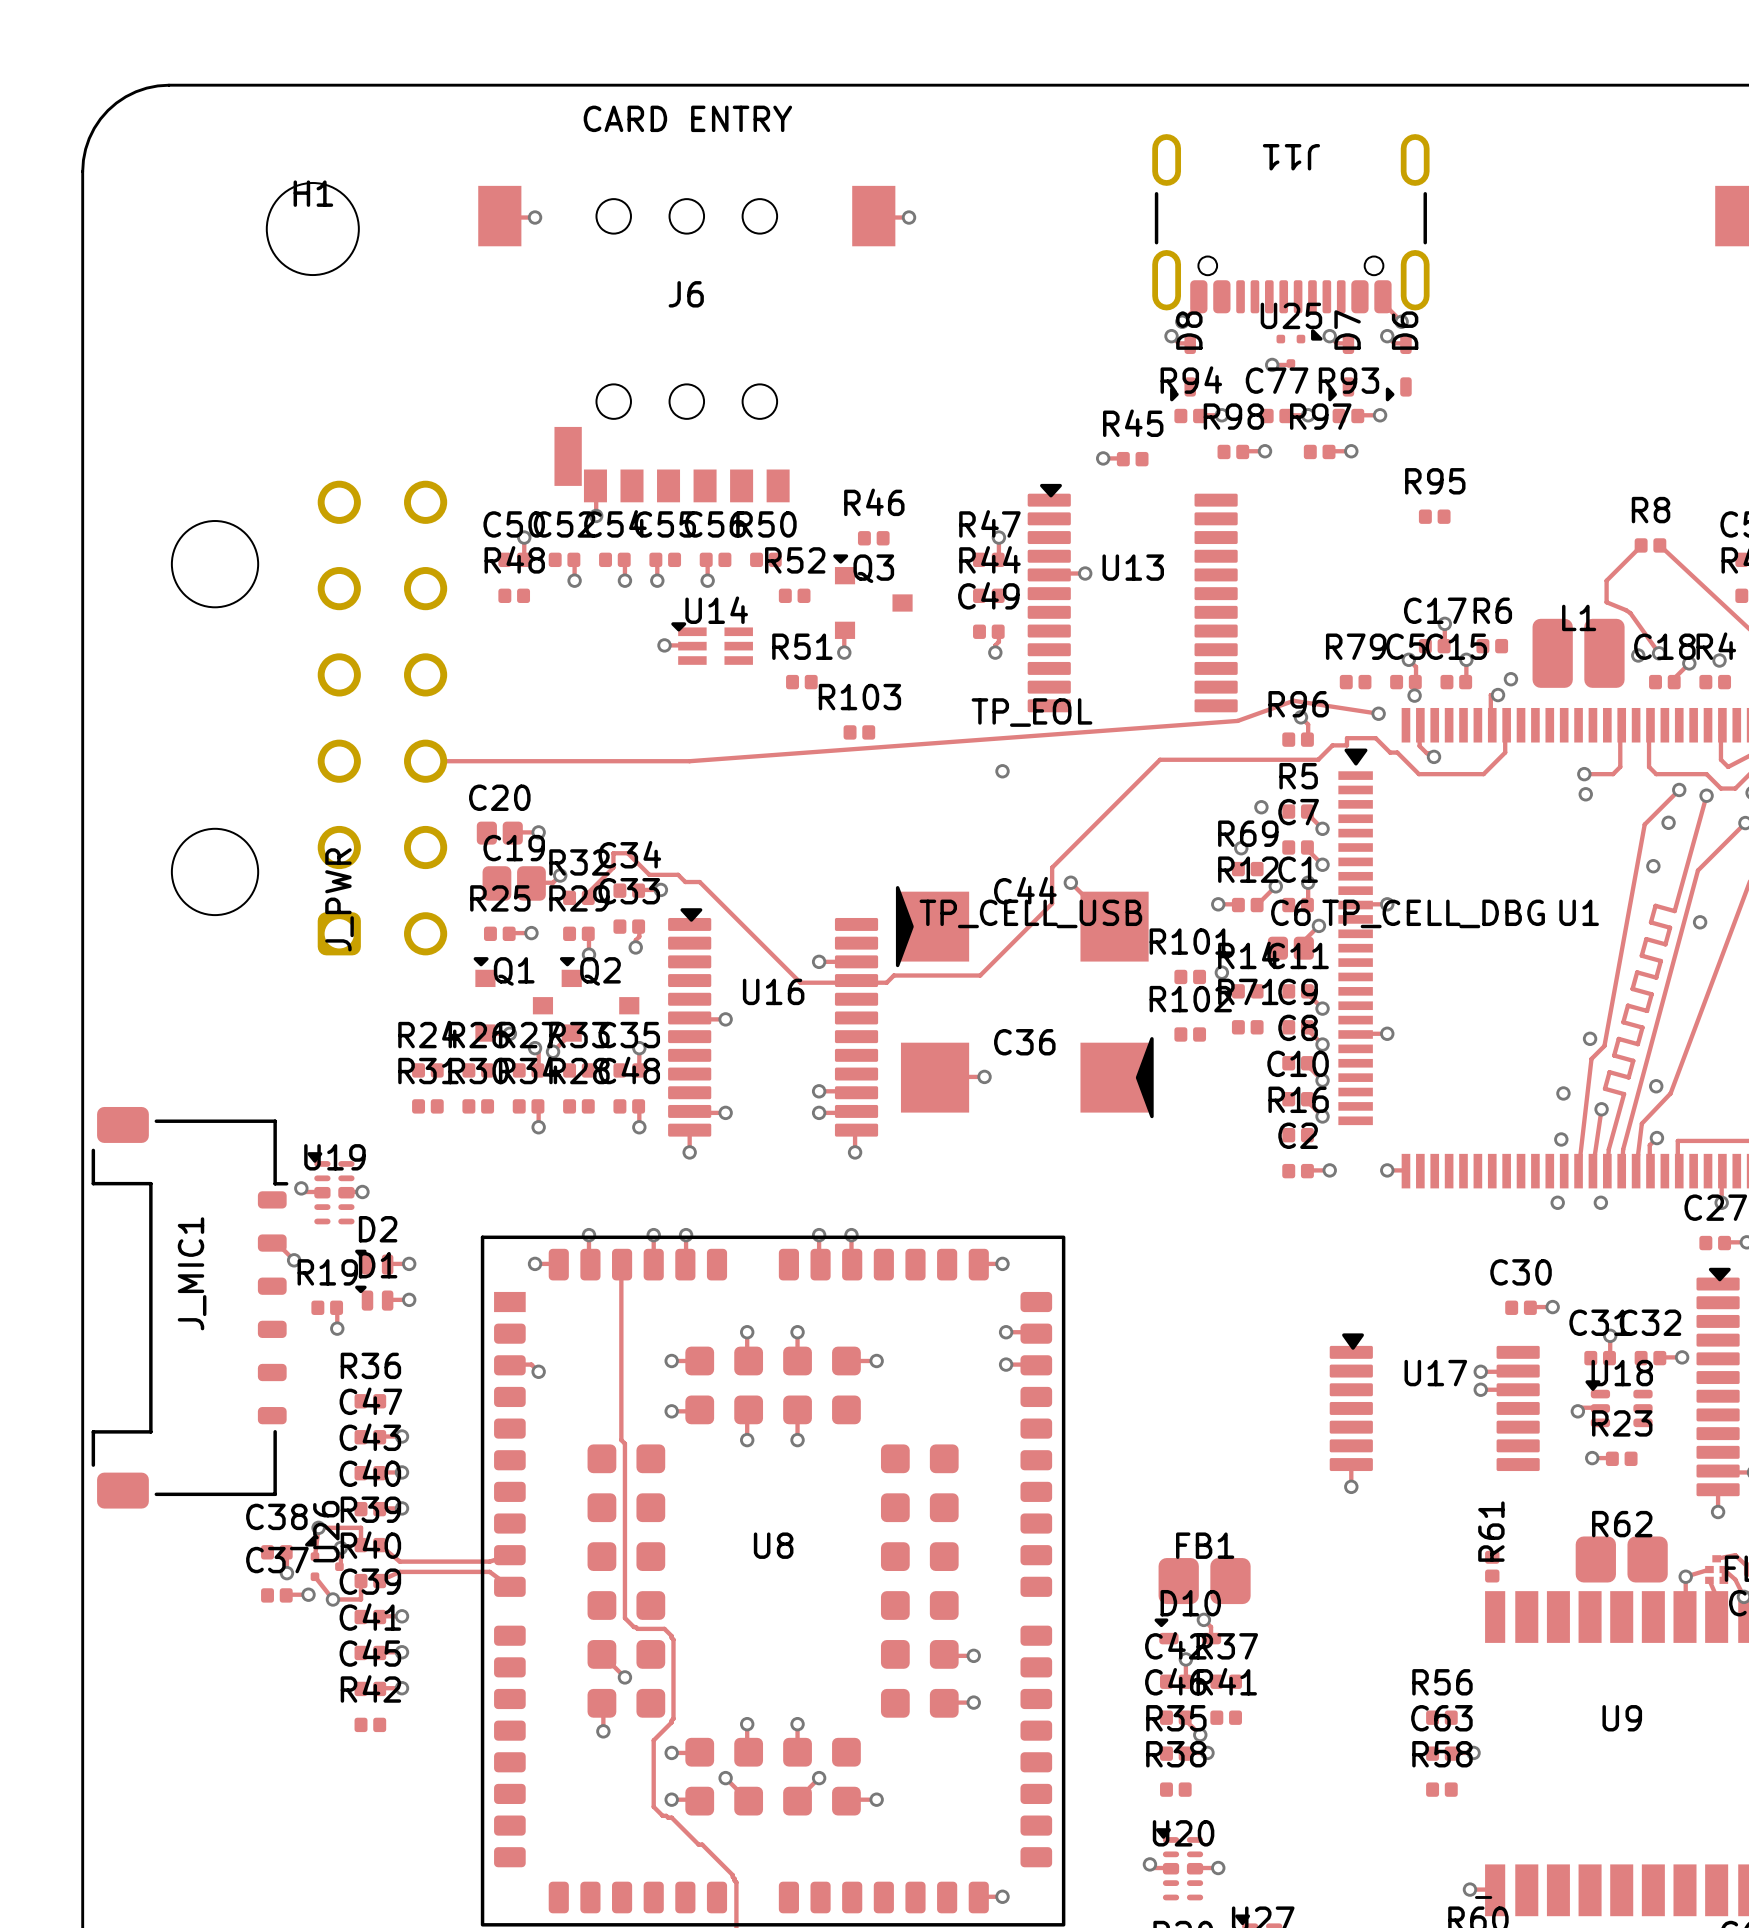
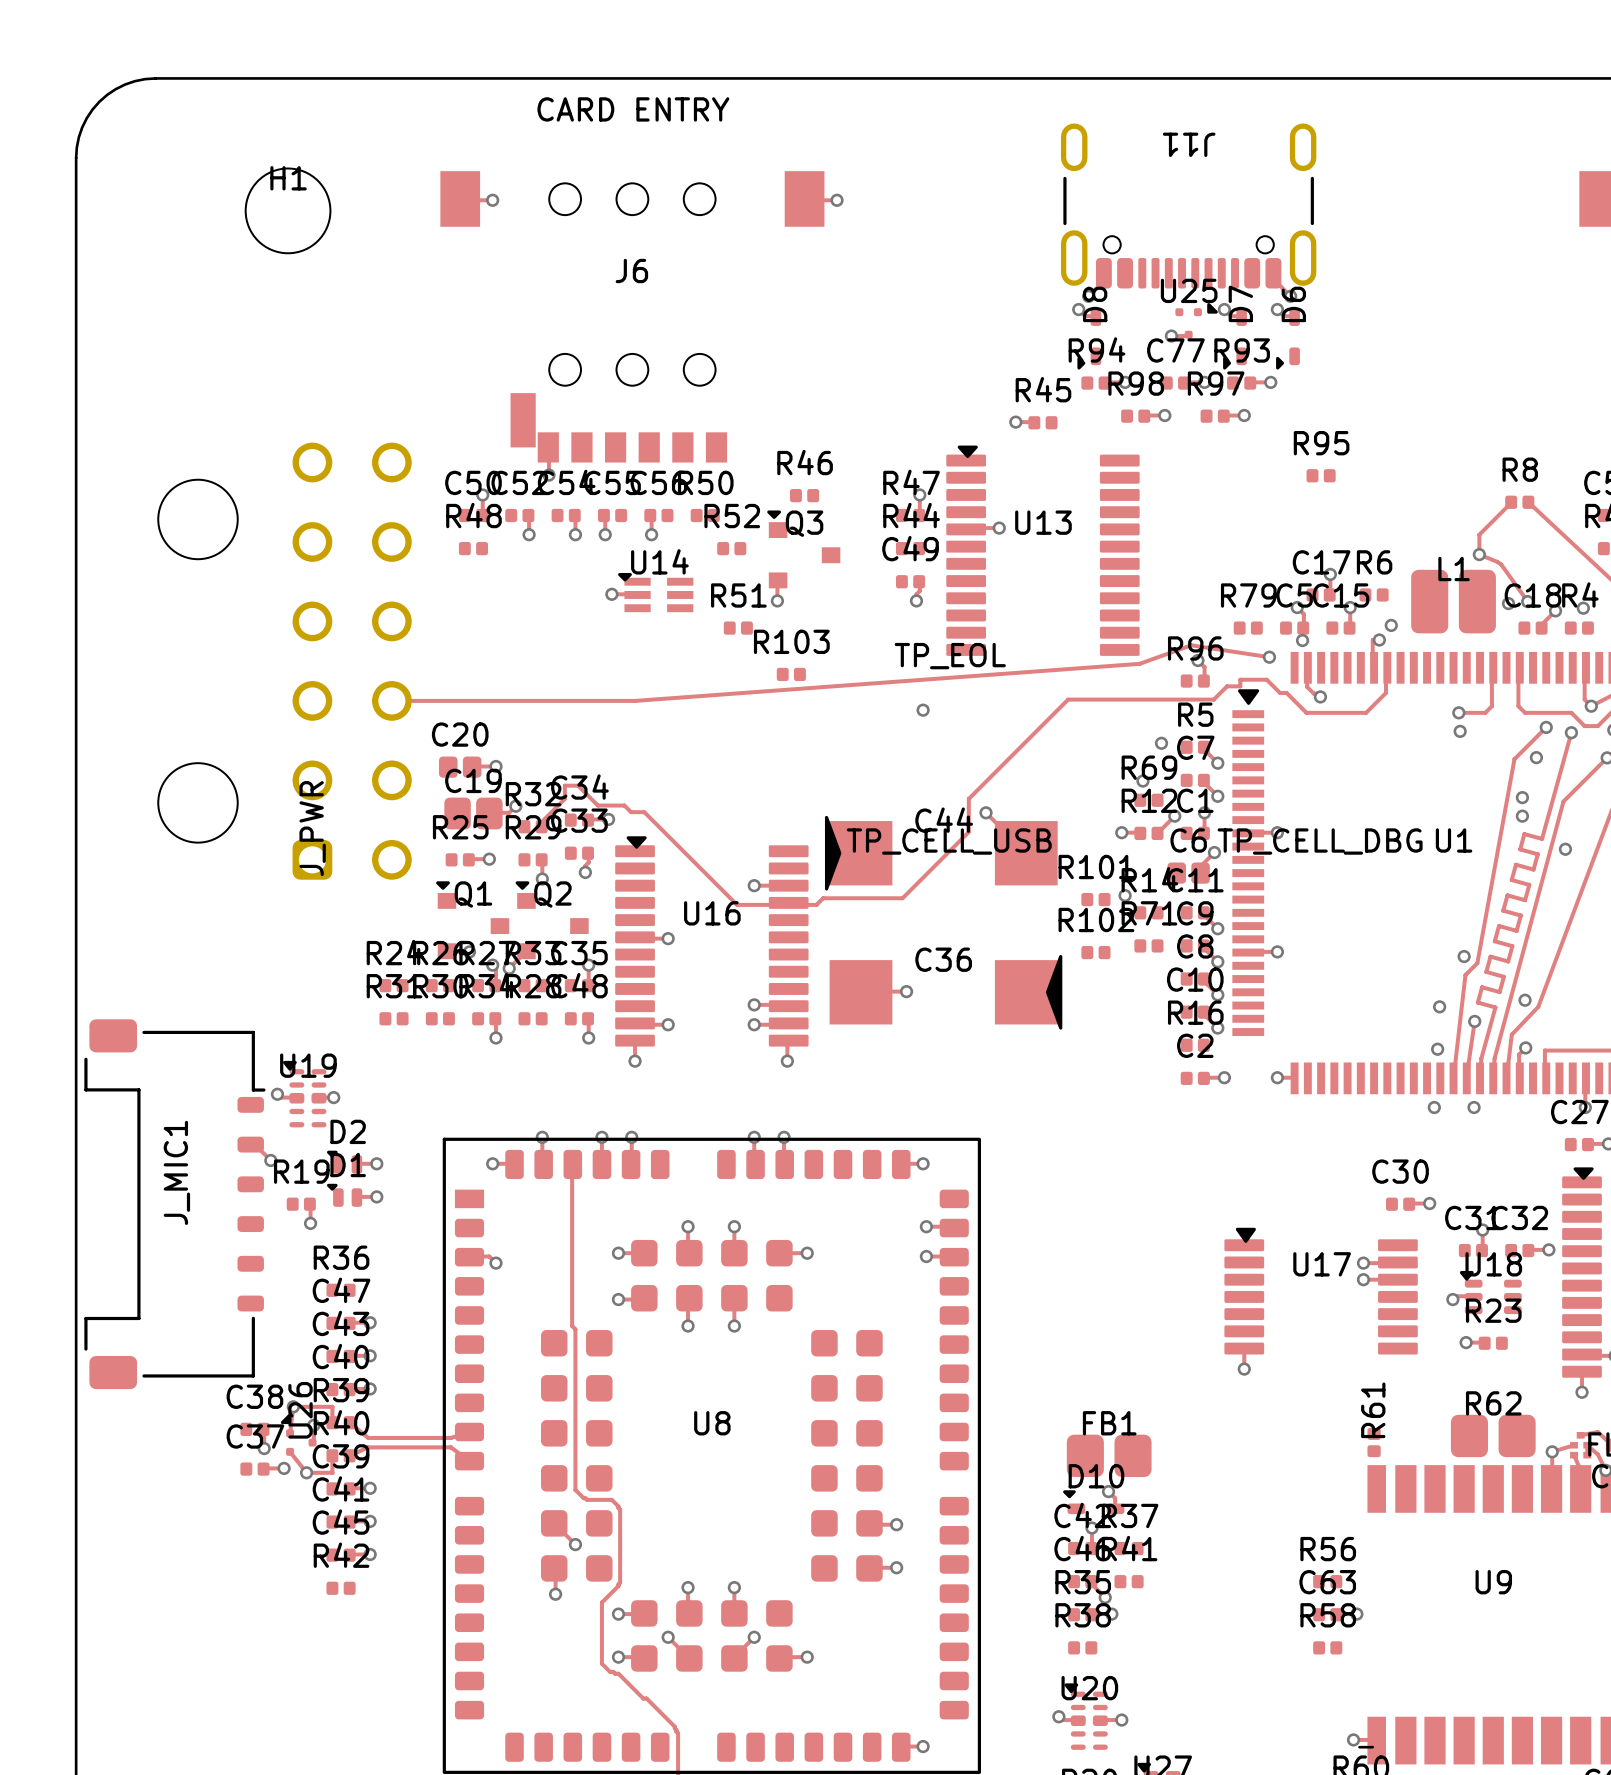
via: none -> (1479, 554)
via: none -> (1591, 706)
via: none -> (1522, 816)

